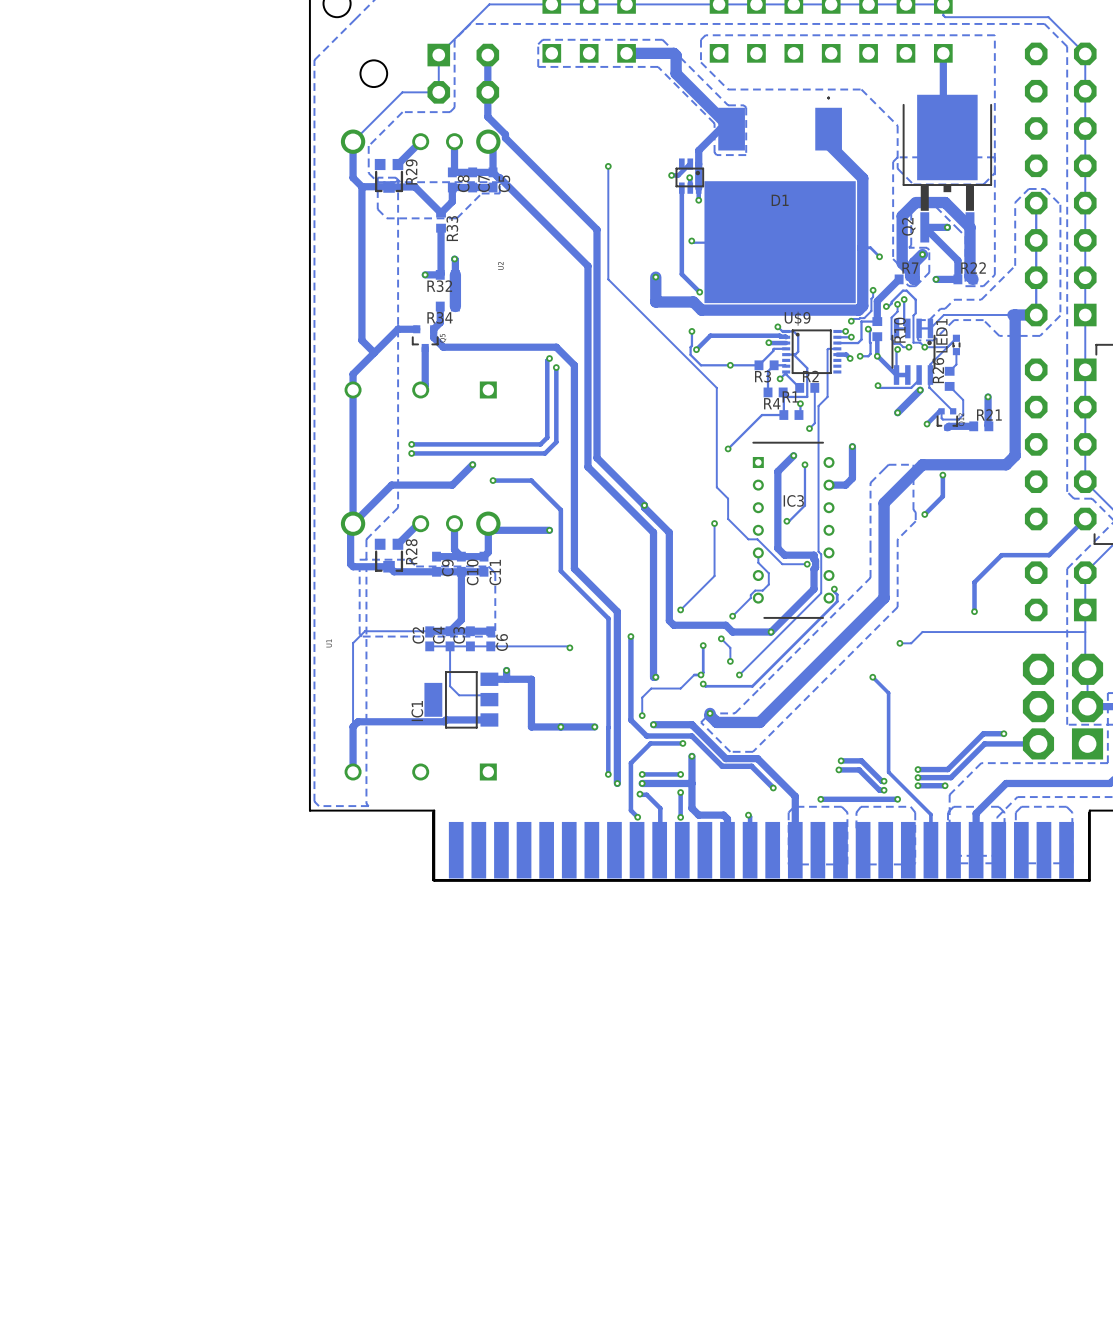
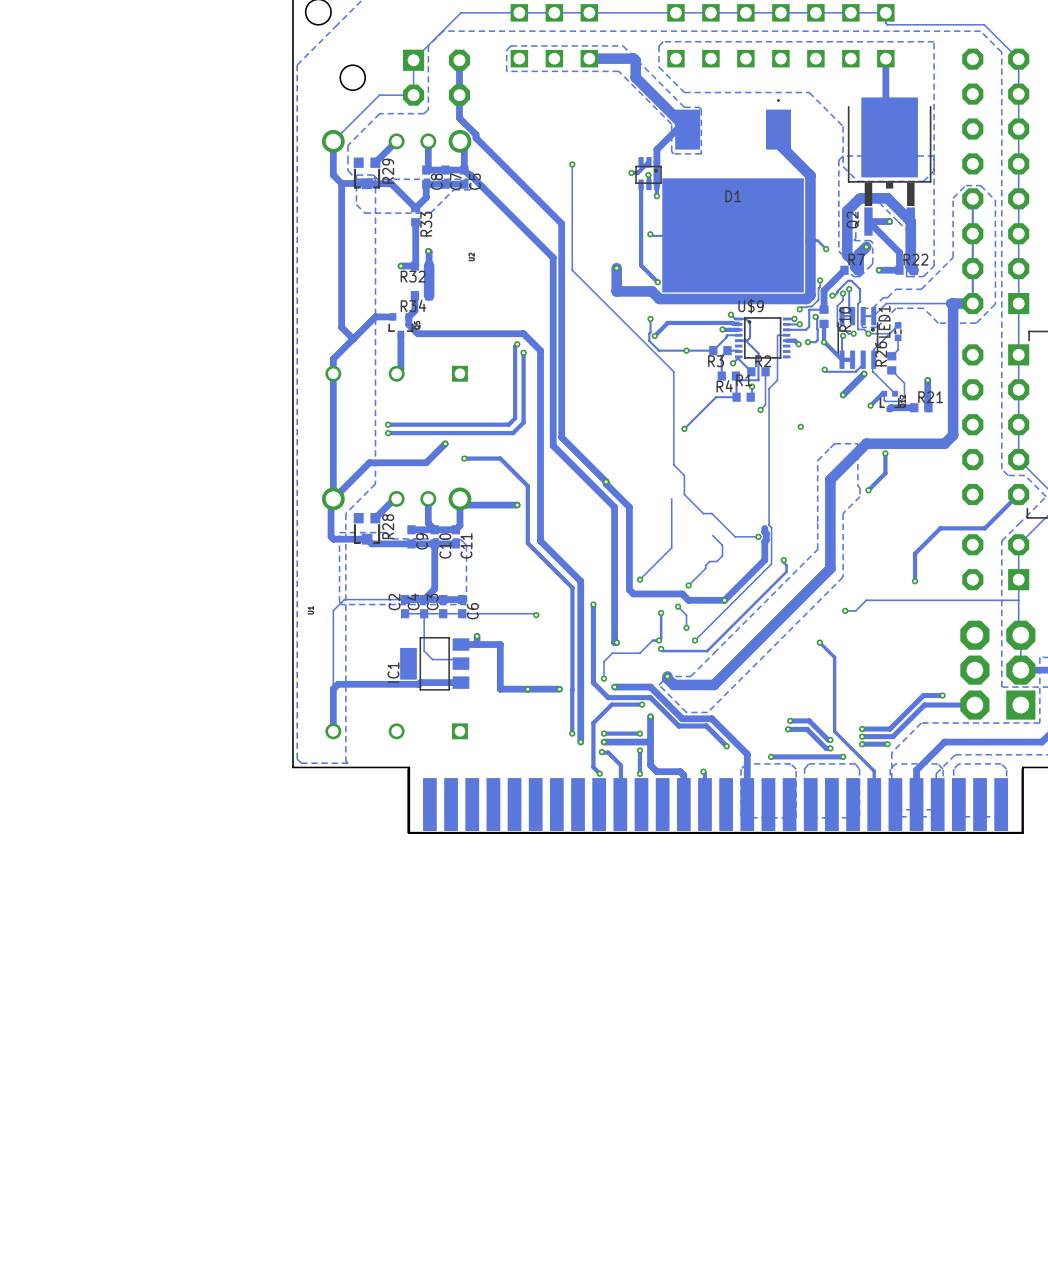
track: (852, 446) (852, 478) (845, 485) (829, 485) -> none
track: (793, 455) (777, 471) (777, 548) (784, 555) (814, 555) -> none
via: (793, 455) -> none
track: (804, 464) (804, 505) (786, 521) -> none
via: (804, 464) -> none
via: (786, 521) -> none
via: (714, 523) -> none
IC3: (793, 530) -> none
track: (758, 552) (758, 562) -> none

